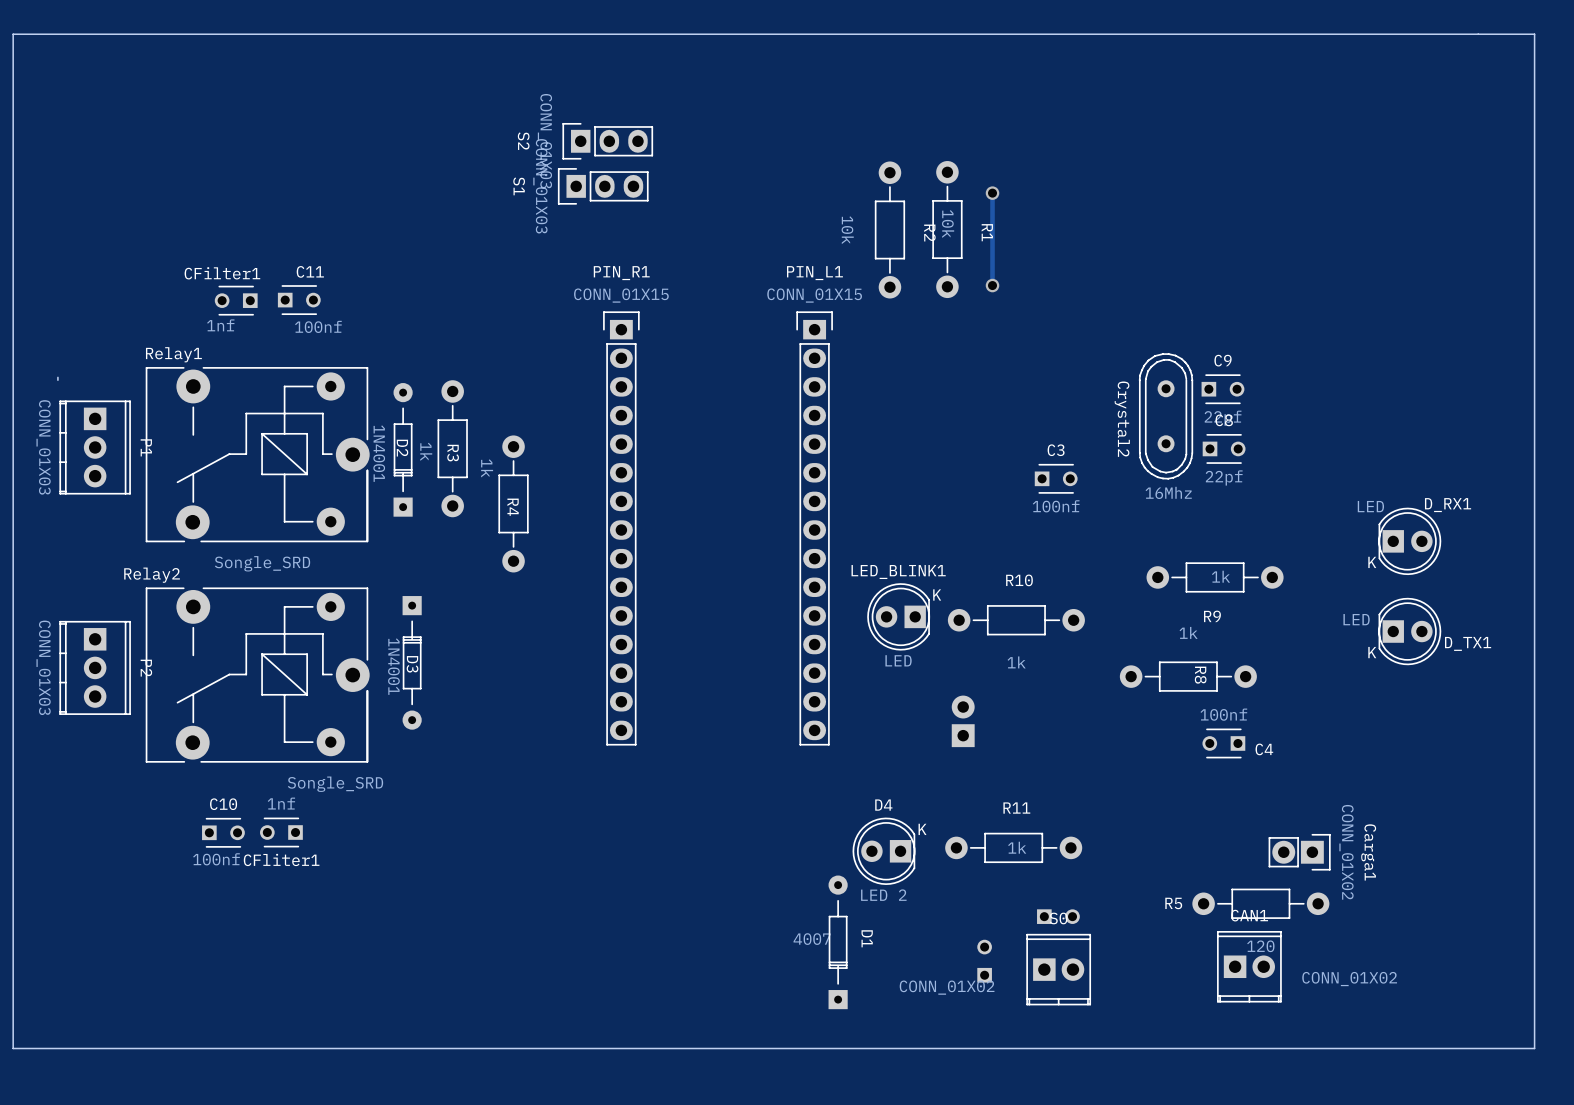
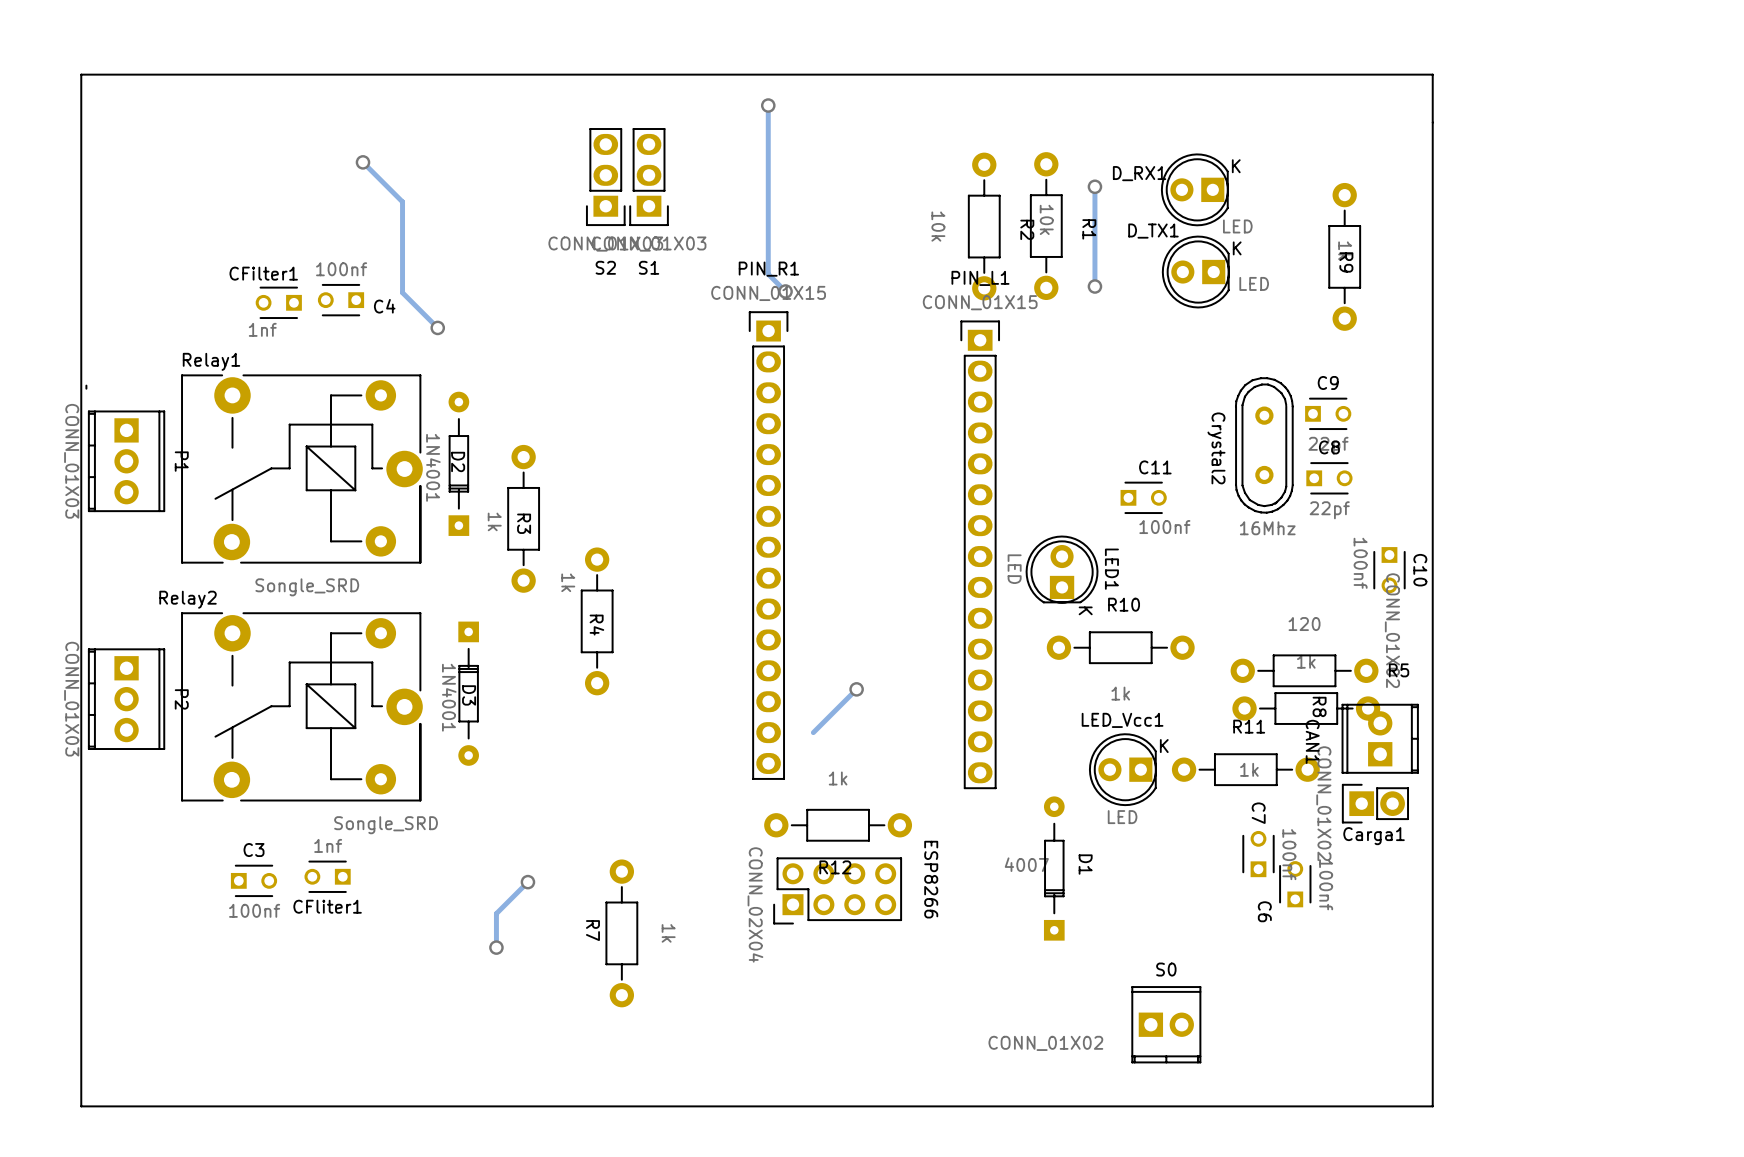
board edge: (1534, 34) (1534, 1048) (13, 1048) (13, 34) (1534, 34) -> (1432, 74) (1432, 1106) (81, 1106) (81, 74) (1432, 74)
track: none -> (768, 105) (768, 274) (785, 291)
via: none -> (768, 105)
S2 rotation: 0° (607, 141) -> 90° counterclockwise (605, 177)
S2 position: (607, 141) -> (605, 177)
track: none -> (362, 162) (402, 201) (402, 292) (437, 327)
via: none -> (362, 162)
S1 rotation: 0° (603, 186) -> 90° counterclockwise (649, 177)
via: none -> (785, 291)
C11 position: (299, 300) -> (1143, 497)
via: none -> (437, 327)
C9 position: (1222, 389) -> (1328, 413)
Crystal2 position: (1166, 416) -> (1264, 445)
R3 position: (452, 448) -> (523, 518)
C8 position: (1224, 448) -> (1329, 478)
C3 position: (1056, 478) -> (254, 880)
R4 position: (513, 503) -> (597, 621)
D_RX1 name position: D_RX1 (1448, 505) -> D_RX1 (1139, 173)
PIN_R1 position: (621, 528) -> (768, 545)
PIN_L1 position: (814, 528) -> (980, 554)
D_RX1 rotation: 0° (1409, 541) -> 180° (1194, 189)
D_RX1 position: (1409, 541) -> (1194, 189)
LED1: none -> LED (1062, 569)
R9 rotation: 0° (1215, 577) -> 90° clockwise (1344, 256)
R9 position: (1215, 577) -> (1344, 256)
LED_BLINK1: LED (898, 616) -> none
R9 name position: R9 (1212, 616) -> R9 (1346, 262)
D_TX1 rotation: 0° (1409, 631) -> 180° (1195, 272)
D_TX1 position: (1409, 631) -> (1195, 272)
D_TX1 name position: D_TX1 (1468, 643) -> D_TX1 (1153, 231)
track: none -> (856, 689) (813, 732)
via: none -> (856, 689)
part: (963, 721) -> none
LED_Vcc1: none -> LED (1122, 769)
C4 position: (1223, 743) -> (340, 300)
R12: none -> 1k (838, 825)
C10 rotation: 0° (223, 832) -> 90° clockwise (1389, 570)
C10 position: (223, 832) -> (1389, 570)
track: none -> (527, 882) (496, 913) (496, 947)
via: none -> (527, 882)
ESP8266: none -> CONN_02X04 (837, 890)
R11 position: (1013, 847) -> (1245, 769)
D4: LED 2 (883, 851) -> none
Carga1 rotation: 0° (1299, 852) -> 180° (1375, 803)
Carga1 position: (1299, 852) -> (1375, 803)
Carga1 name position: Carga1 (1368, 852) -> Carga1 (1374, 836)
R7: none -> 1k (621, 933)
via: none -> (496, 947)
R5 name position: R5 (1173, 903) -> R5 (1399, 670)
R5 position: (1260, 903) -> (1304, 670)
C6 side: top (1058, 916) -> bottom (1295, 884)
D1 position: (838, 942) -> (1054, 868)
R5 value position: 120 (1260, 946) -> 120 (1304, 624)
C7 side: top (984, 961) -> bottom (1258, 854)
CAN1 rotation: 0° (1249, 966) -> 90° counterclockwise (1380, 738)
CAN1 position: (1249, 966) -> (1380, 738)

